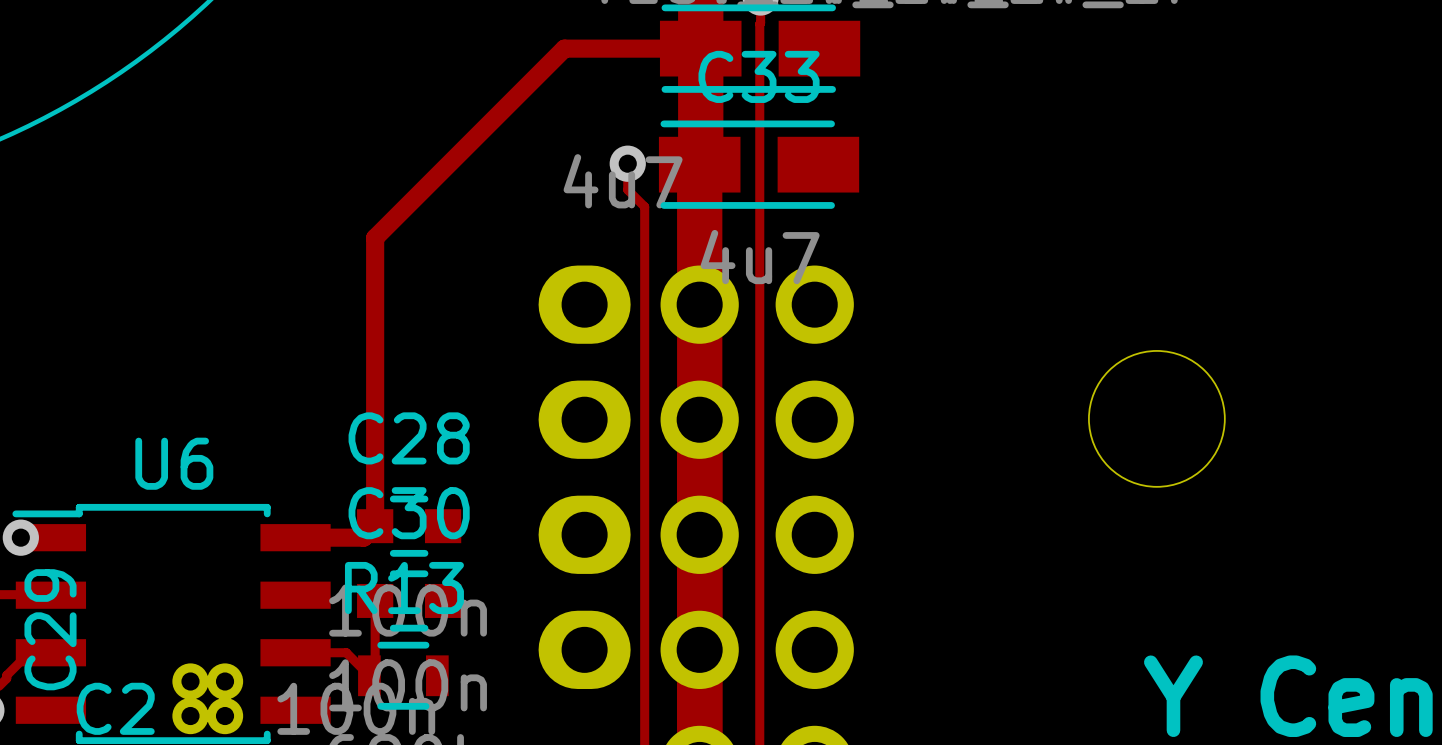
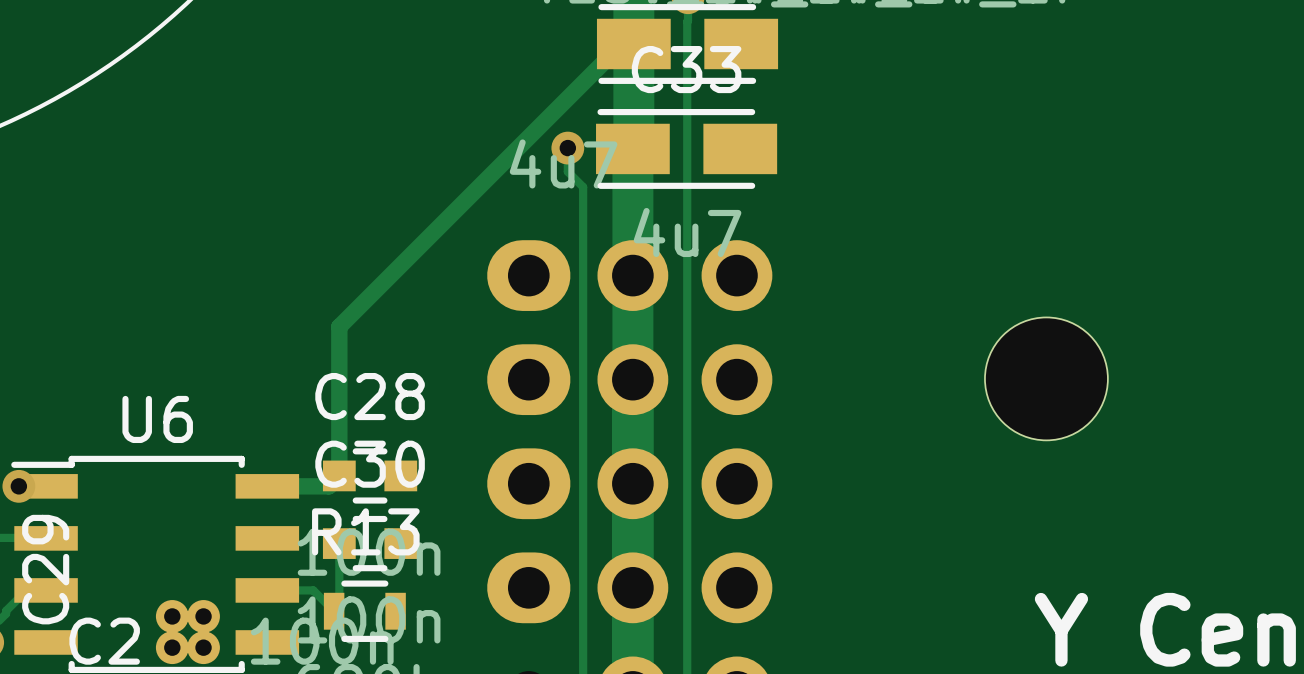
track: (687, 48) (564, 48) (375, 237) (375, 361) -> (622, 43) (339, 326)

